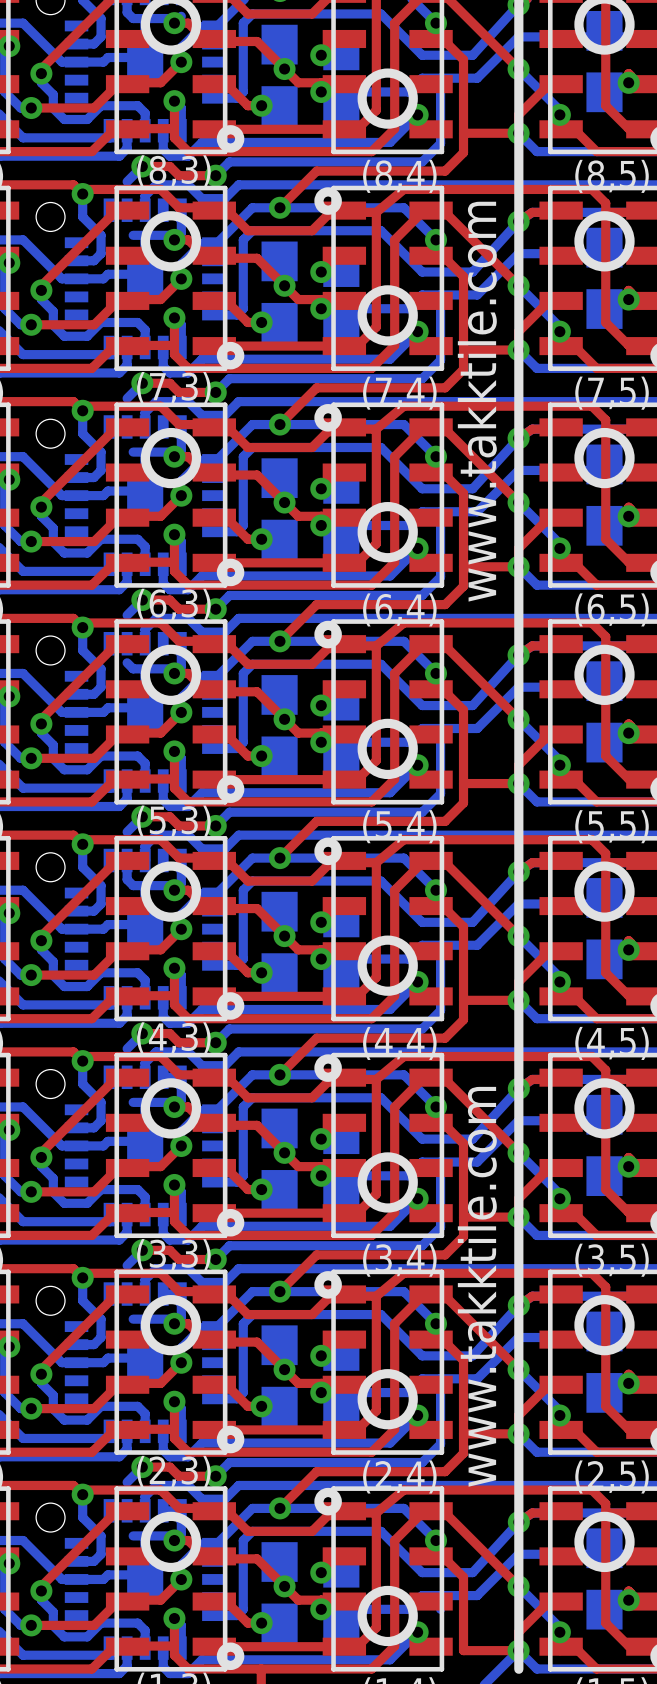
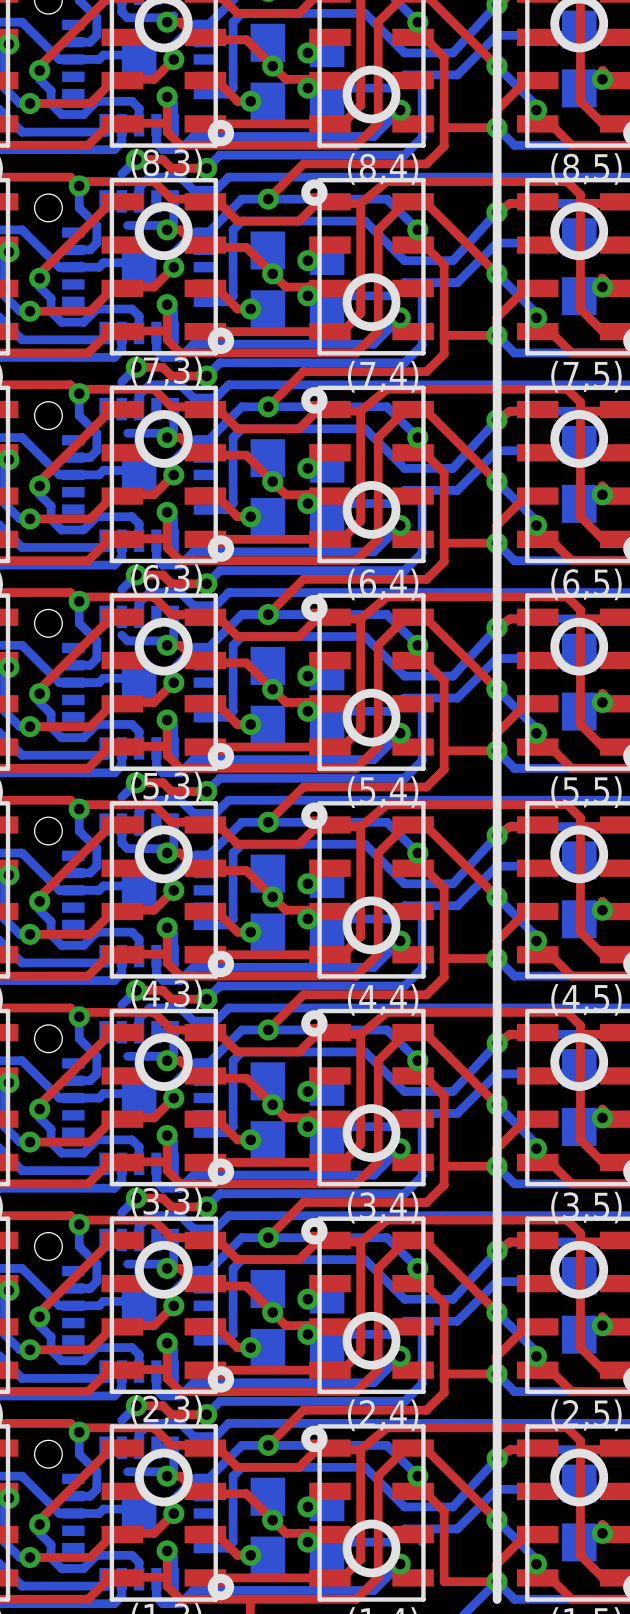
text: www.takktile.com (477, 401) -> none
text: www.takktile.com (477, 1286) -> none

